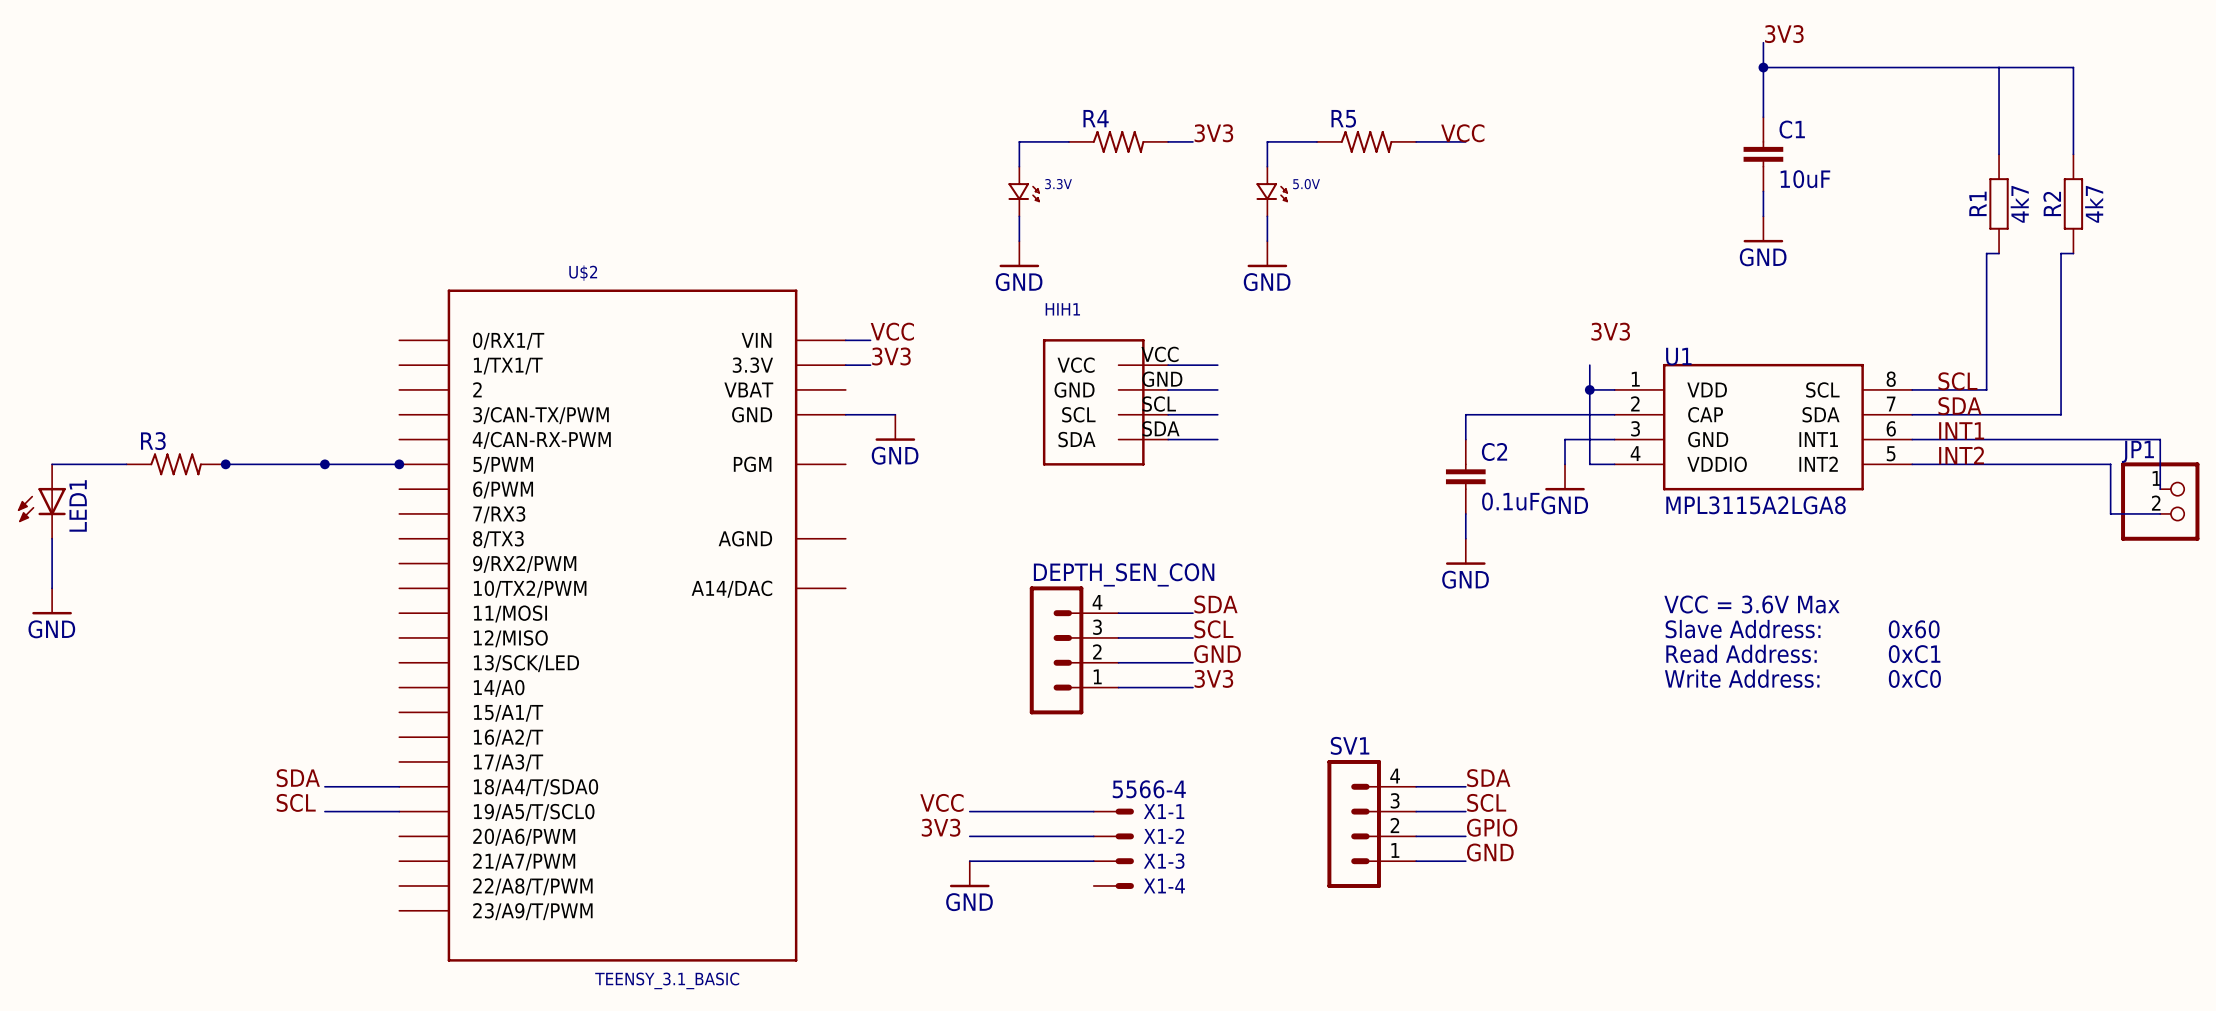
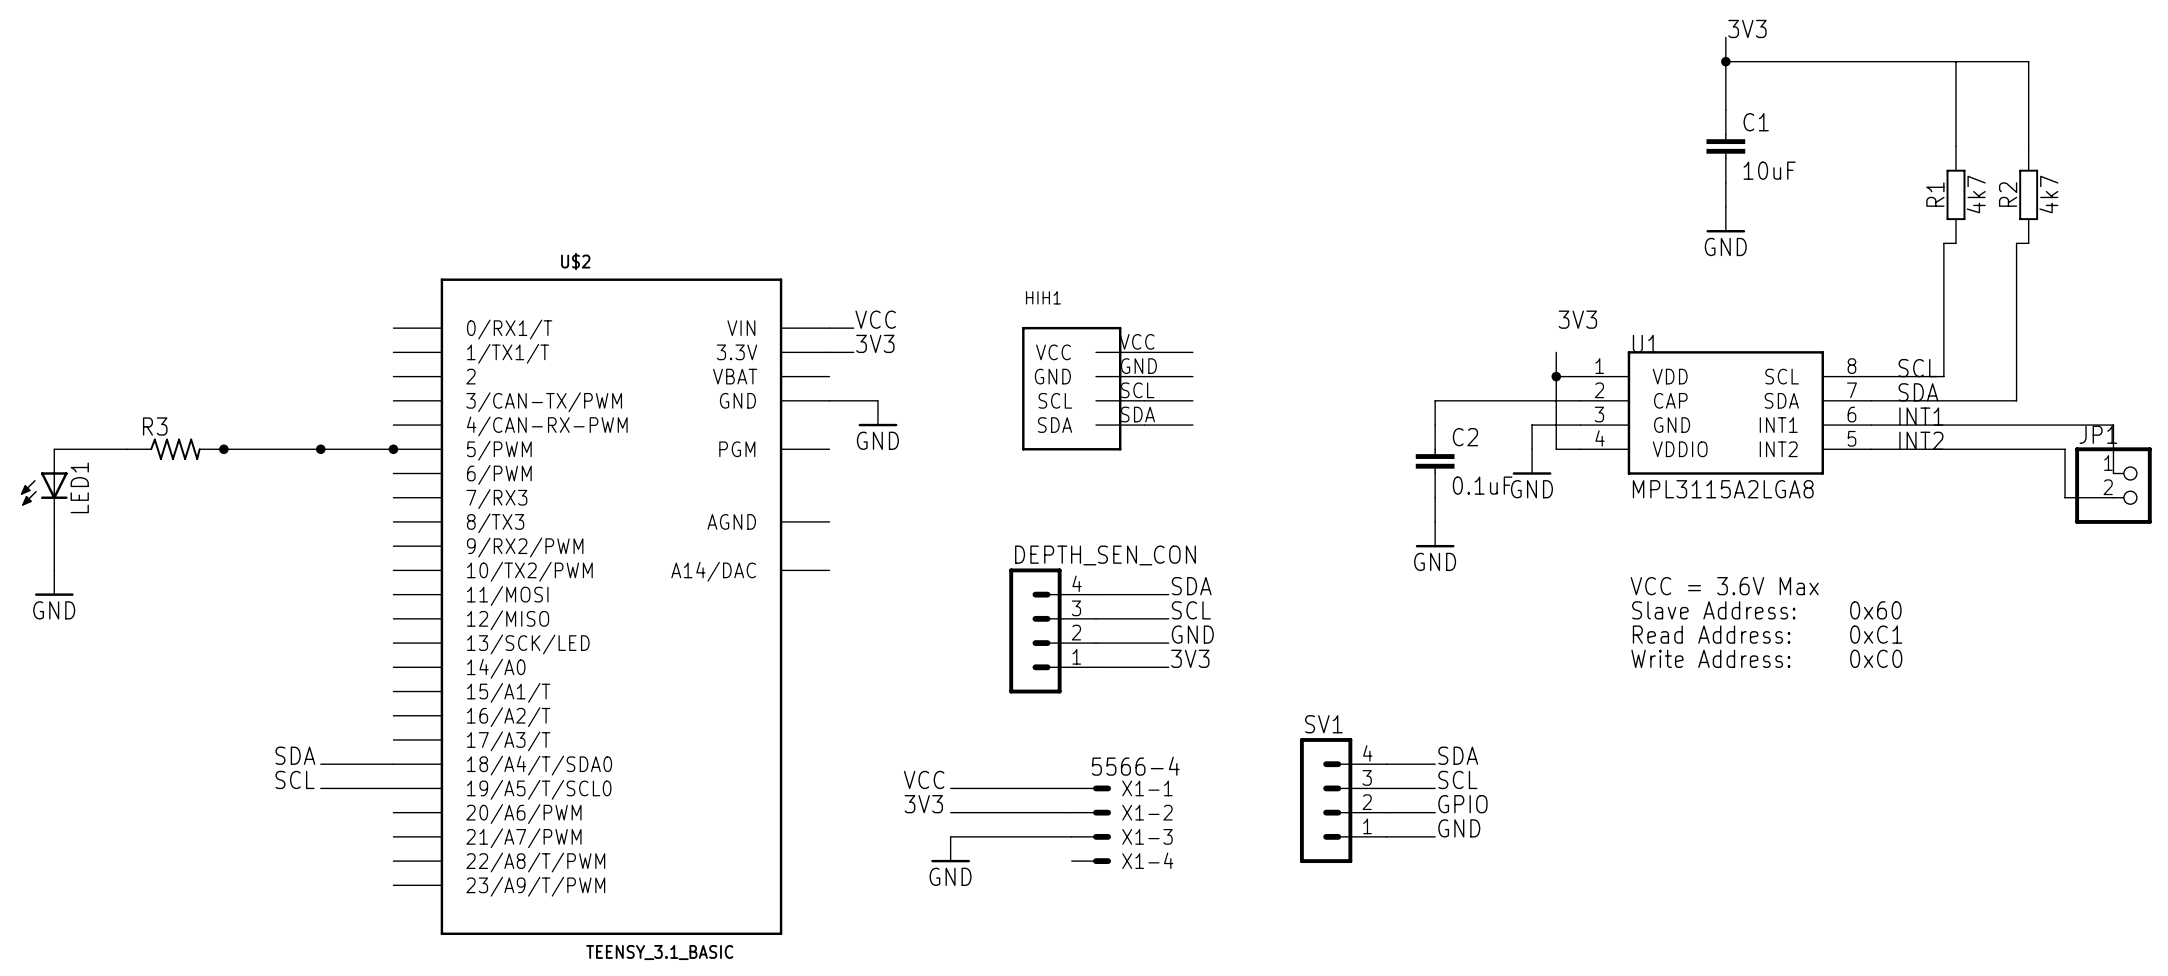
label: 3V3 (1213, 133) -> none
label: VCC (1462, 133) -> none
wire: (1068, 141) (1019, 141) (1019, 166) -> none
R4: (1118, 141) -> none
wire: (1168, 141) (1192, 141) -> none
wire: (1316, 141) (1267, 141) (1267, 166) -> none
R5: (1366, 141) -> none
wire: (1416, 141) (1465, 141) -> none
3.3V: (1024, 191) -> none
5.0V: (1272, 191) -> none
wire: (1019, 216) (1019, 241) -> none
wire: (1267, 216) (1267, 241) -> none
power symbol: GND (1019, 254) -> none
power symbol: GND (1267, 254) -> none

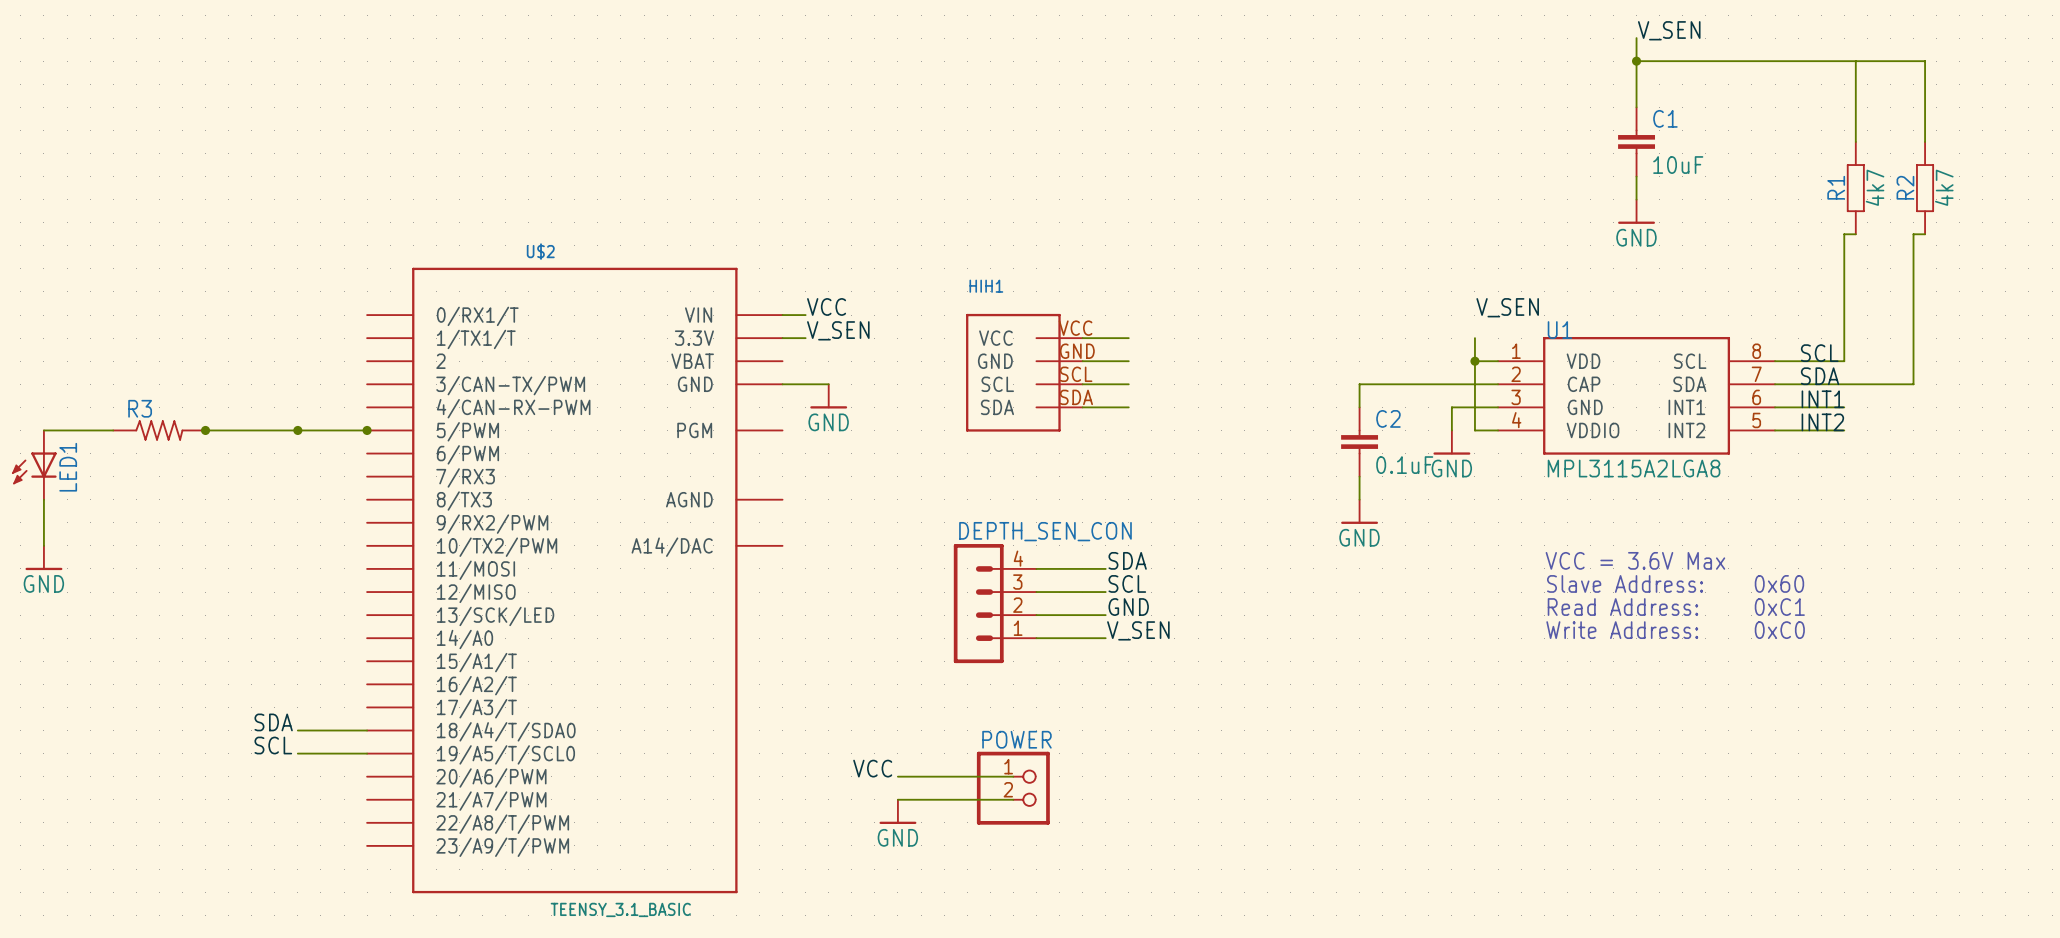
label: 3V3 (1747, 28) -> V_SEN (1669, 30)
label: 3V3 (1577, 319) -> V_SEN (1507, 307)
label: 3V3 (875, 343) -> V_SEN (838, 330)
wire: (1943, 425) (2113, 425) (2113, 473) -> none
wire: (1943, 449) (2065, 449) (2065, 497) (2113, 497) -> none
JP1: (2113, 485) -> none
label: 3V3 (1190, 658) -> V_SEN (1138, 630)
label: SDA (1458, 755) -> none
wire: (1386, 764) (1435, 764) -> none
label: VCC (924, 779) -> none
label: SCL (1457, 779) -> none
wire: (950, 788) (1071, 788) -> none
X1-1: 5566-4 (1091, 788) -> none
wire: (1386, 788) (1435, 788) -> none
SV1: (1343, 800) -> none
label: 3V3 (923, 804) -> VCC (872, 768)
label: GPIO (1462, 804) -> none
X1-2: (1091, 812) -> none
wire: (1386, 812) (1435, 812) -> none
POWER: none -> (1013, 788)
label: GND (1459, 828) -> none
X1-3: (1091, 836) -> none
wire: (1386, 836) (1435, 836) -> none
X1-4: (1091, 861) -> none

